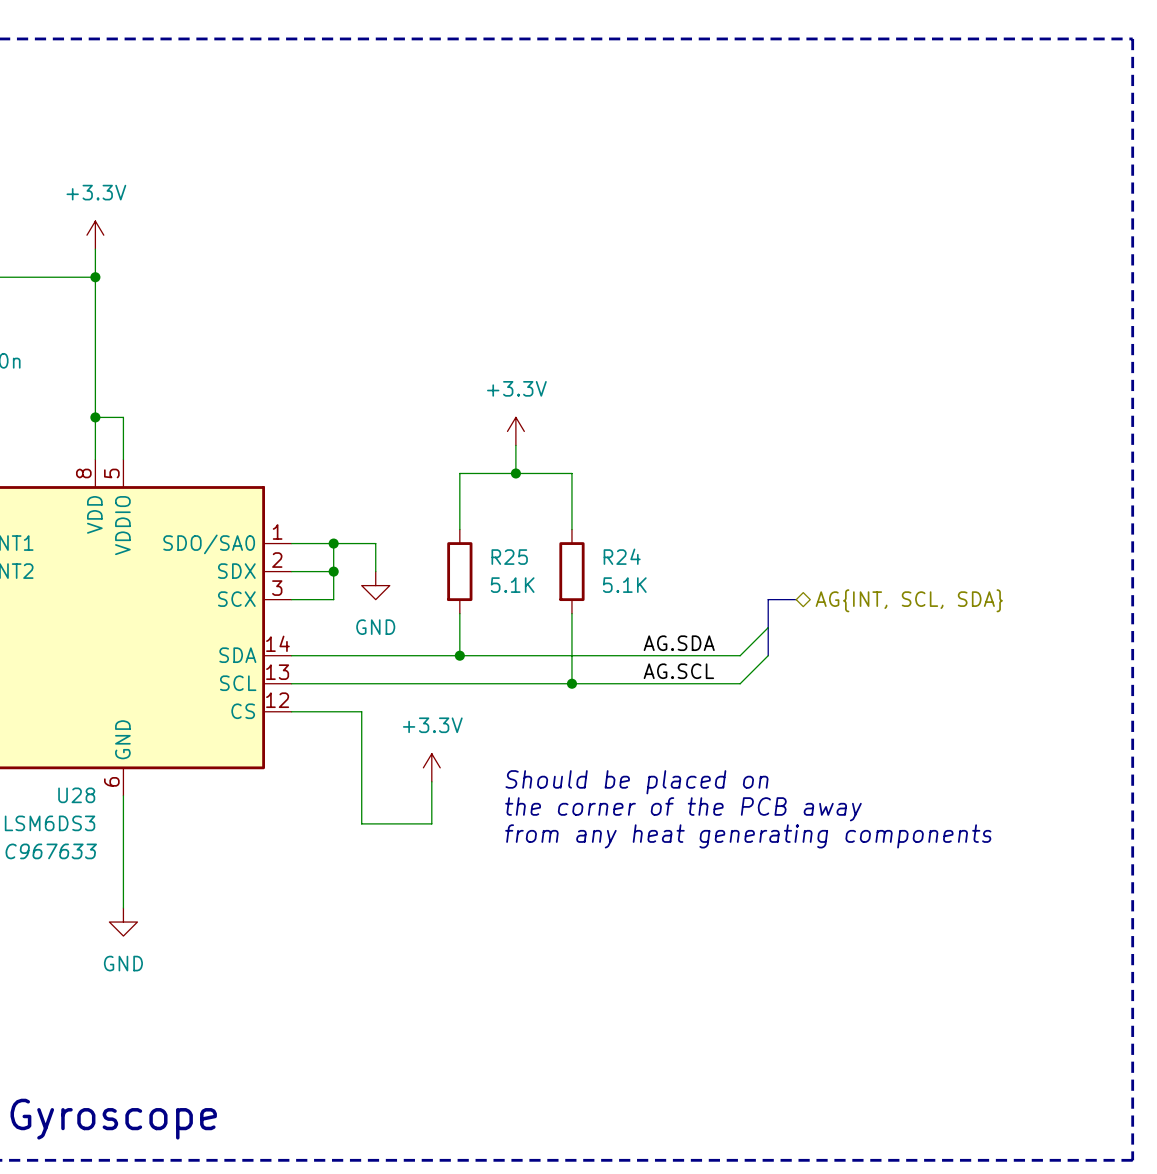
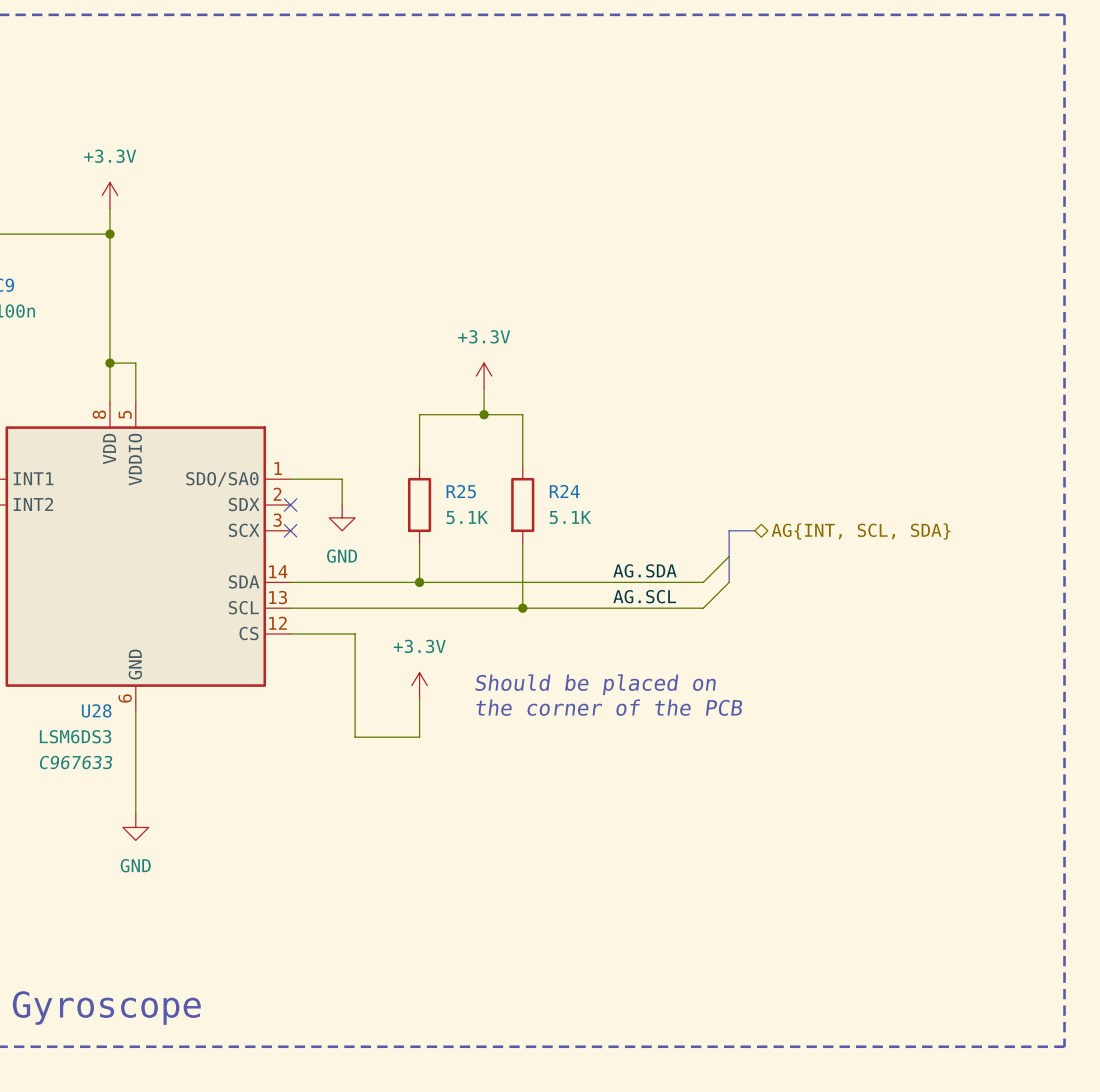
power symbol position: +3.3V (515, 431) -> +3.3V (484, 376)
wire: (515, 445) (515, 473) -> (484, 388) (484, 414)
wire: (459, 473) (459, 529) -> (445, 414) (419, 414) (419, 466)
junction position: (515, 473) -> (484, 414)
wire: (543, 473) (571, 473) (571, 529) -> (522, 414) (522, 466)
wire: (333, 543) (333, 599) (291, 599) -> none
junction: (333, 543) -> none
wire: (347, 543) (375, 543) (375, 571) -> (342, 479) (342, 505)
wire: (291, 571) (333, 571) -> none
no-connect mark: none -> (290, 505)
junction: (333, 571) -> none
R25 position: (459, 571) -> (419, 505)
R24 position: (571, 571) -> (522, 505)
power symbol position: GND (375, 585) -> GND (342, 517)
no-connect mark: none -> (290, 530)
wire: (459, 613) (459, 655) -> (419, 543) (419, 582)
wire: (571, 613) (571, 683) -> (522, 543) (522, 608)
junction position: (459, 655) -> (419, 582)
junction position: (571, 683) -> (522, 608)
text position: Should be placed on (637, 782) -> Should be placed on (595, 684)
text: the corner of the PCB away (683, 809) -> the corner of the PCB (609, 707)
text: from any heat generating components (748, 836) -> none

